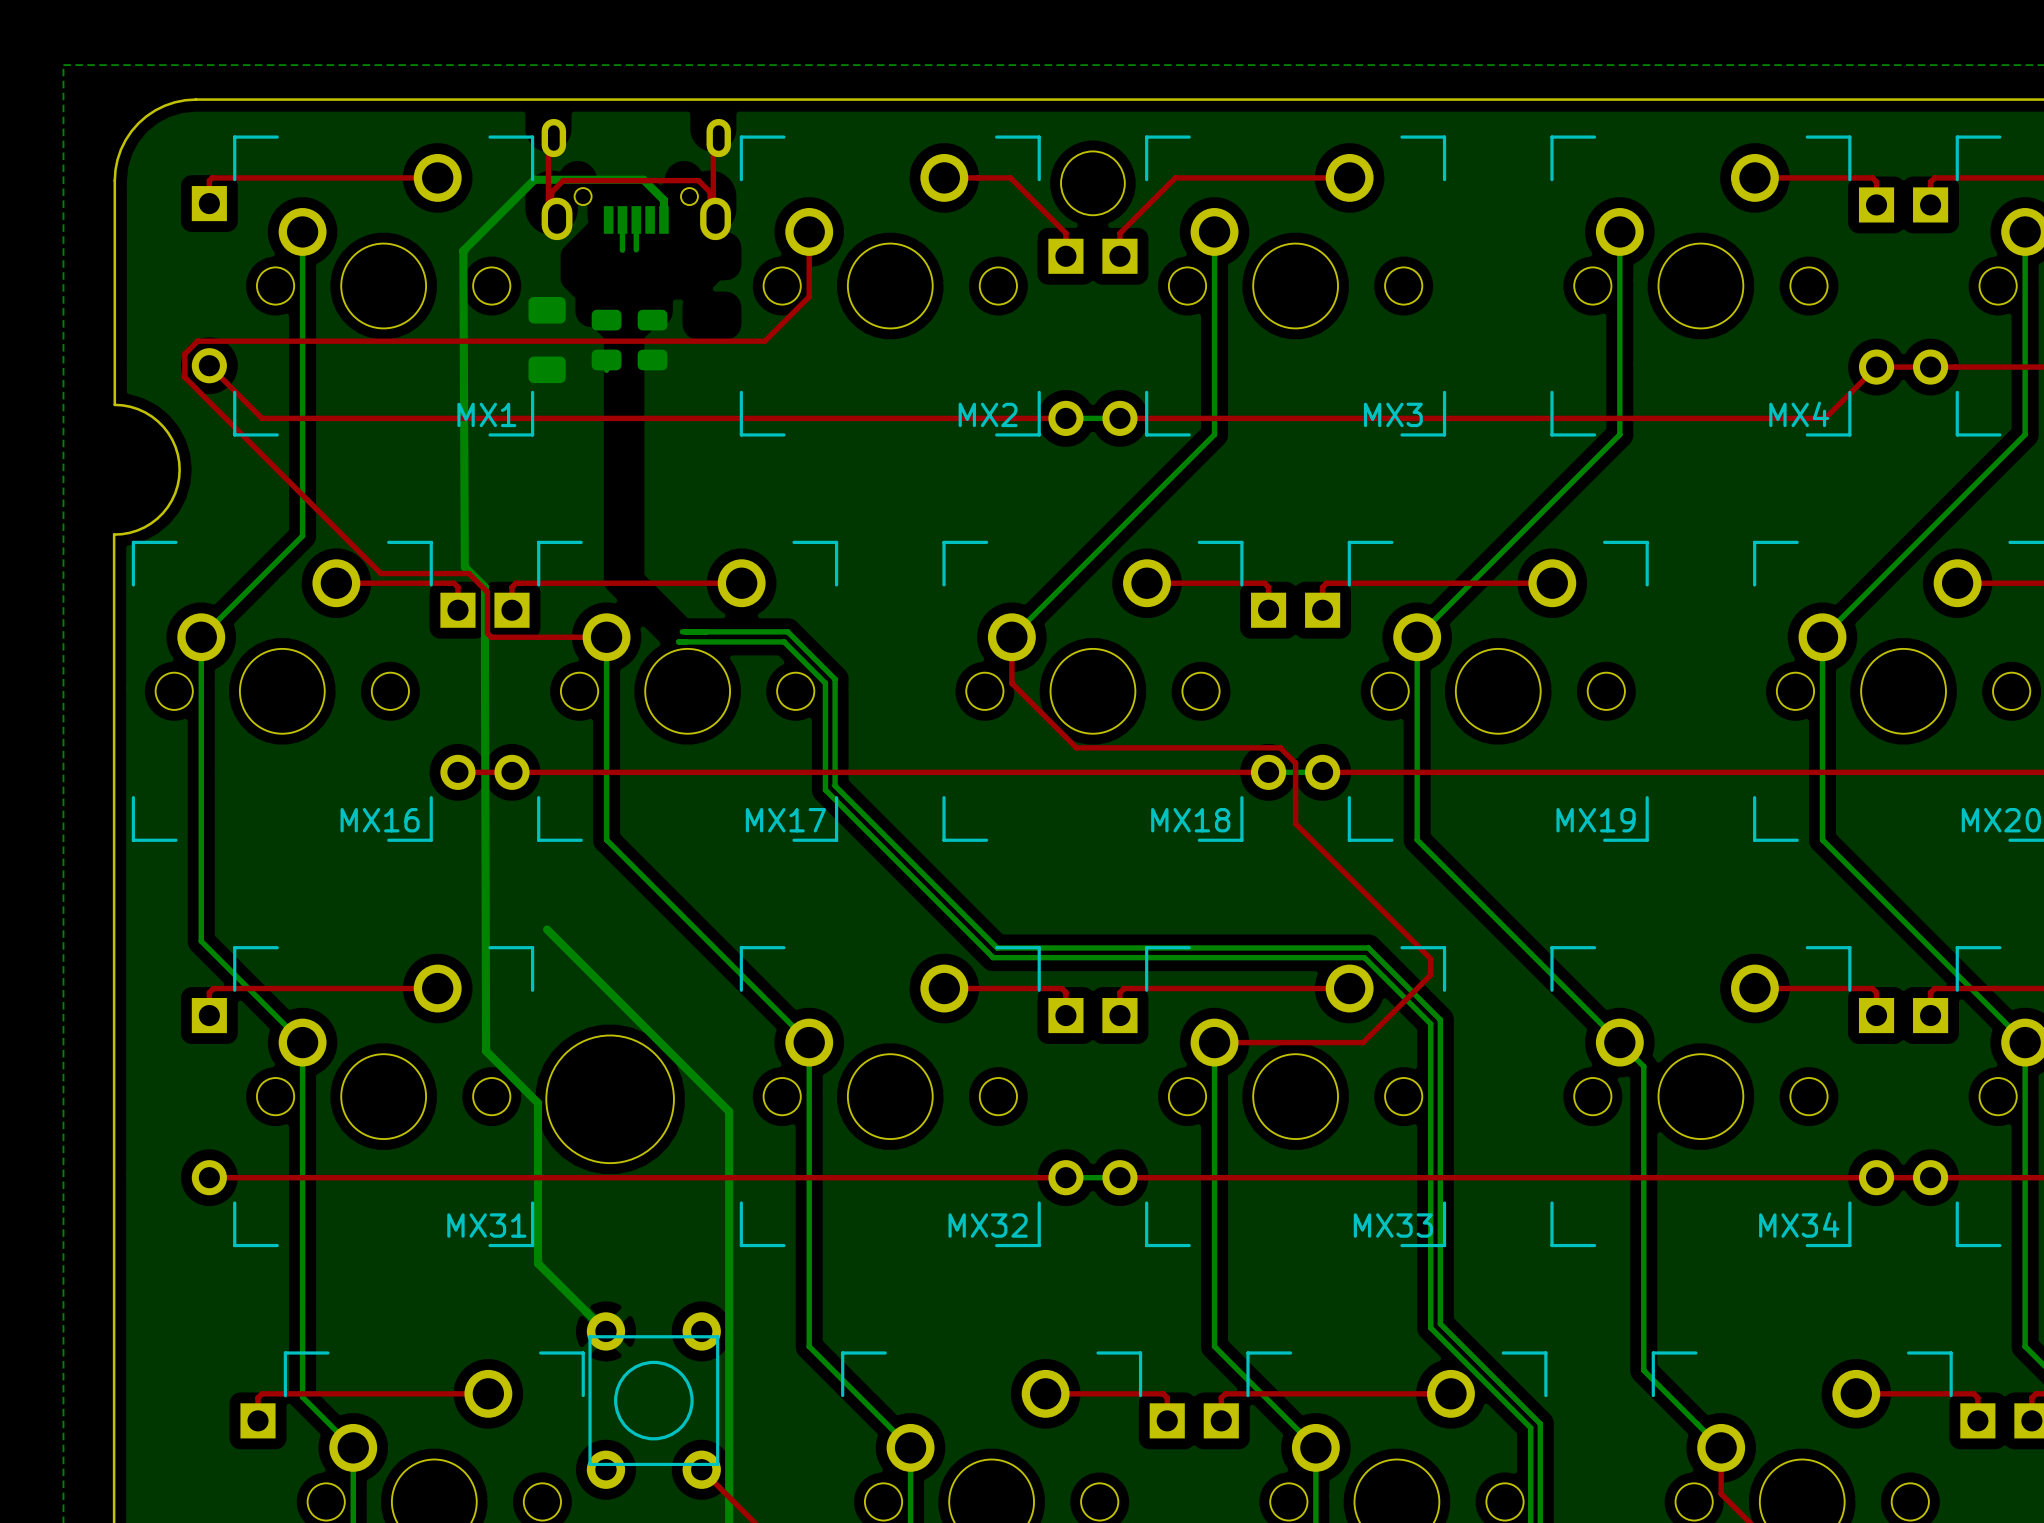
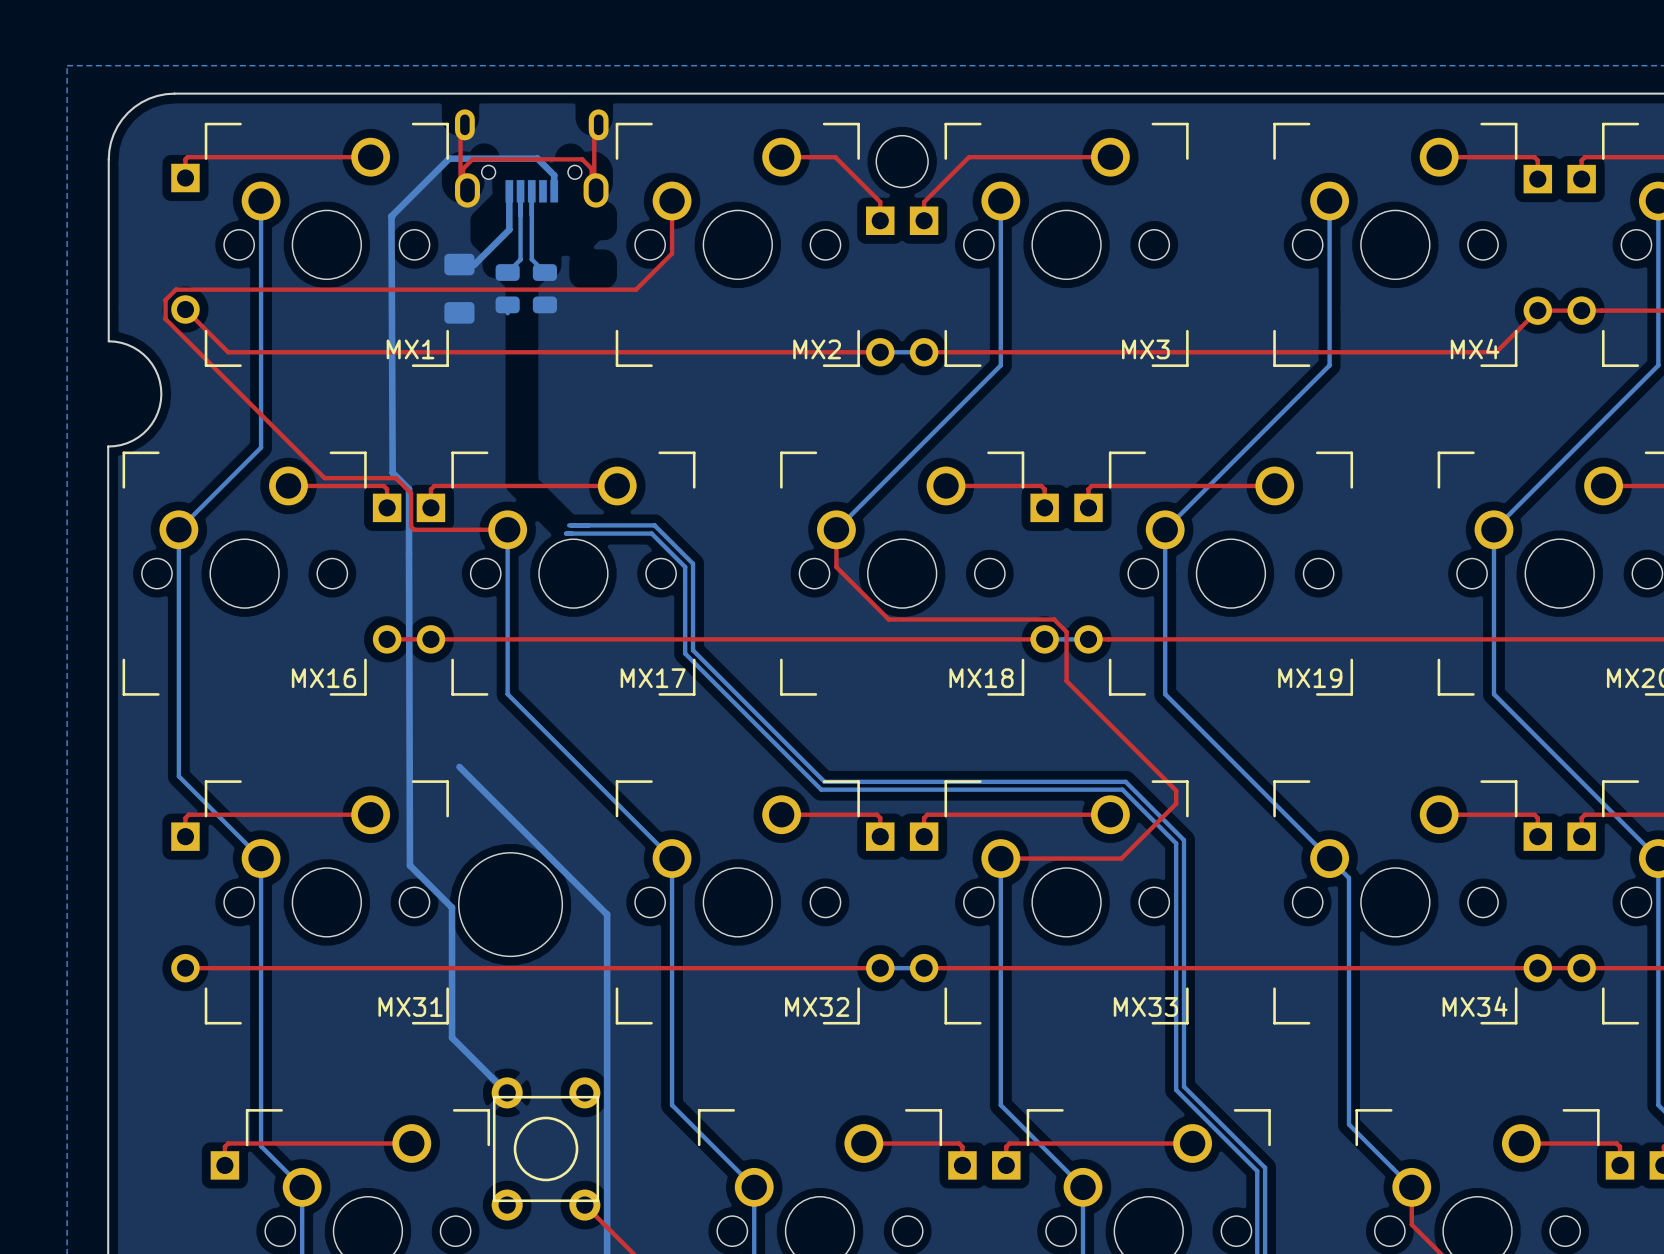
bottom track: none -> (509, 191) (509, 229) (474, 264) (459, 264)
bottom track: none -> (531, 215) (531, 259) (544, 272)
bottom track: none -> (520, 215) (520, 259) (507, 272)

